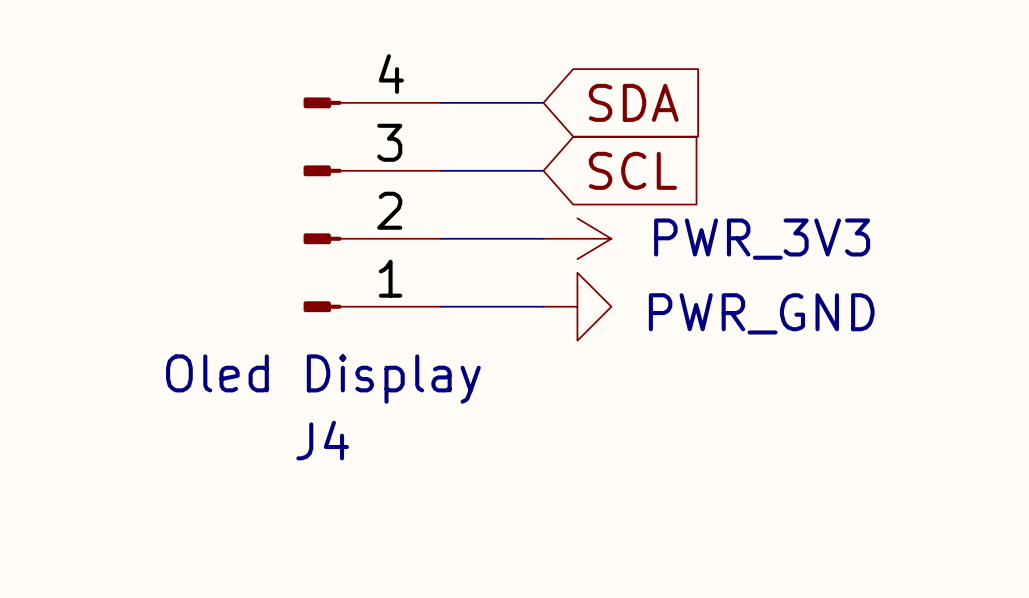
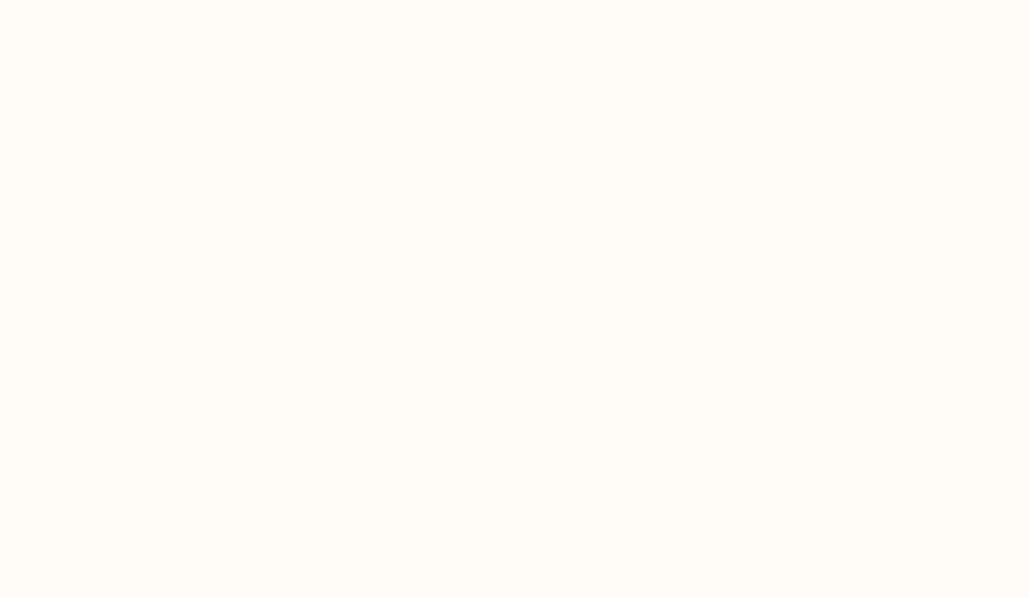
wire: (441, 102) (543, 102) -> none
global label: SDA (633, 102) -> none
wire: (441, 170) (543, 170) -> none
global label: SCL (632, 170) -> none
J4: Oled Display (372, 204) -> none
wire: (441, 238) (543, 238) -> none
power symbol: PWR_3V3 (577, 238) -> none
wire: (441, 306) (543, 306) -> none
power symbol: PWR_GND (577, 306) -> none

